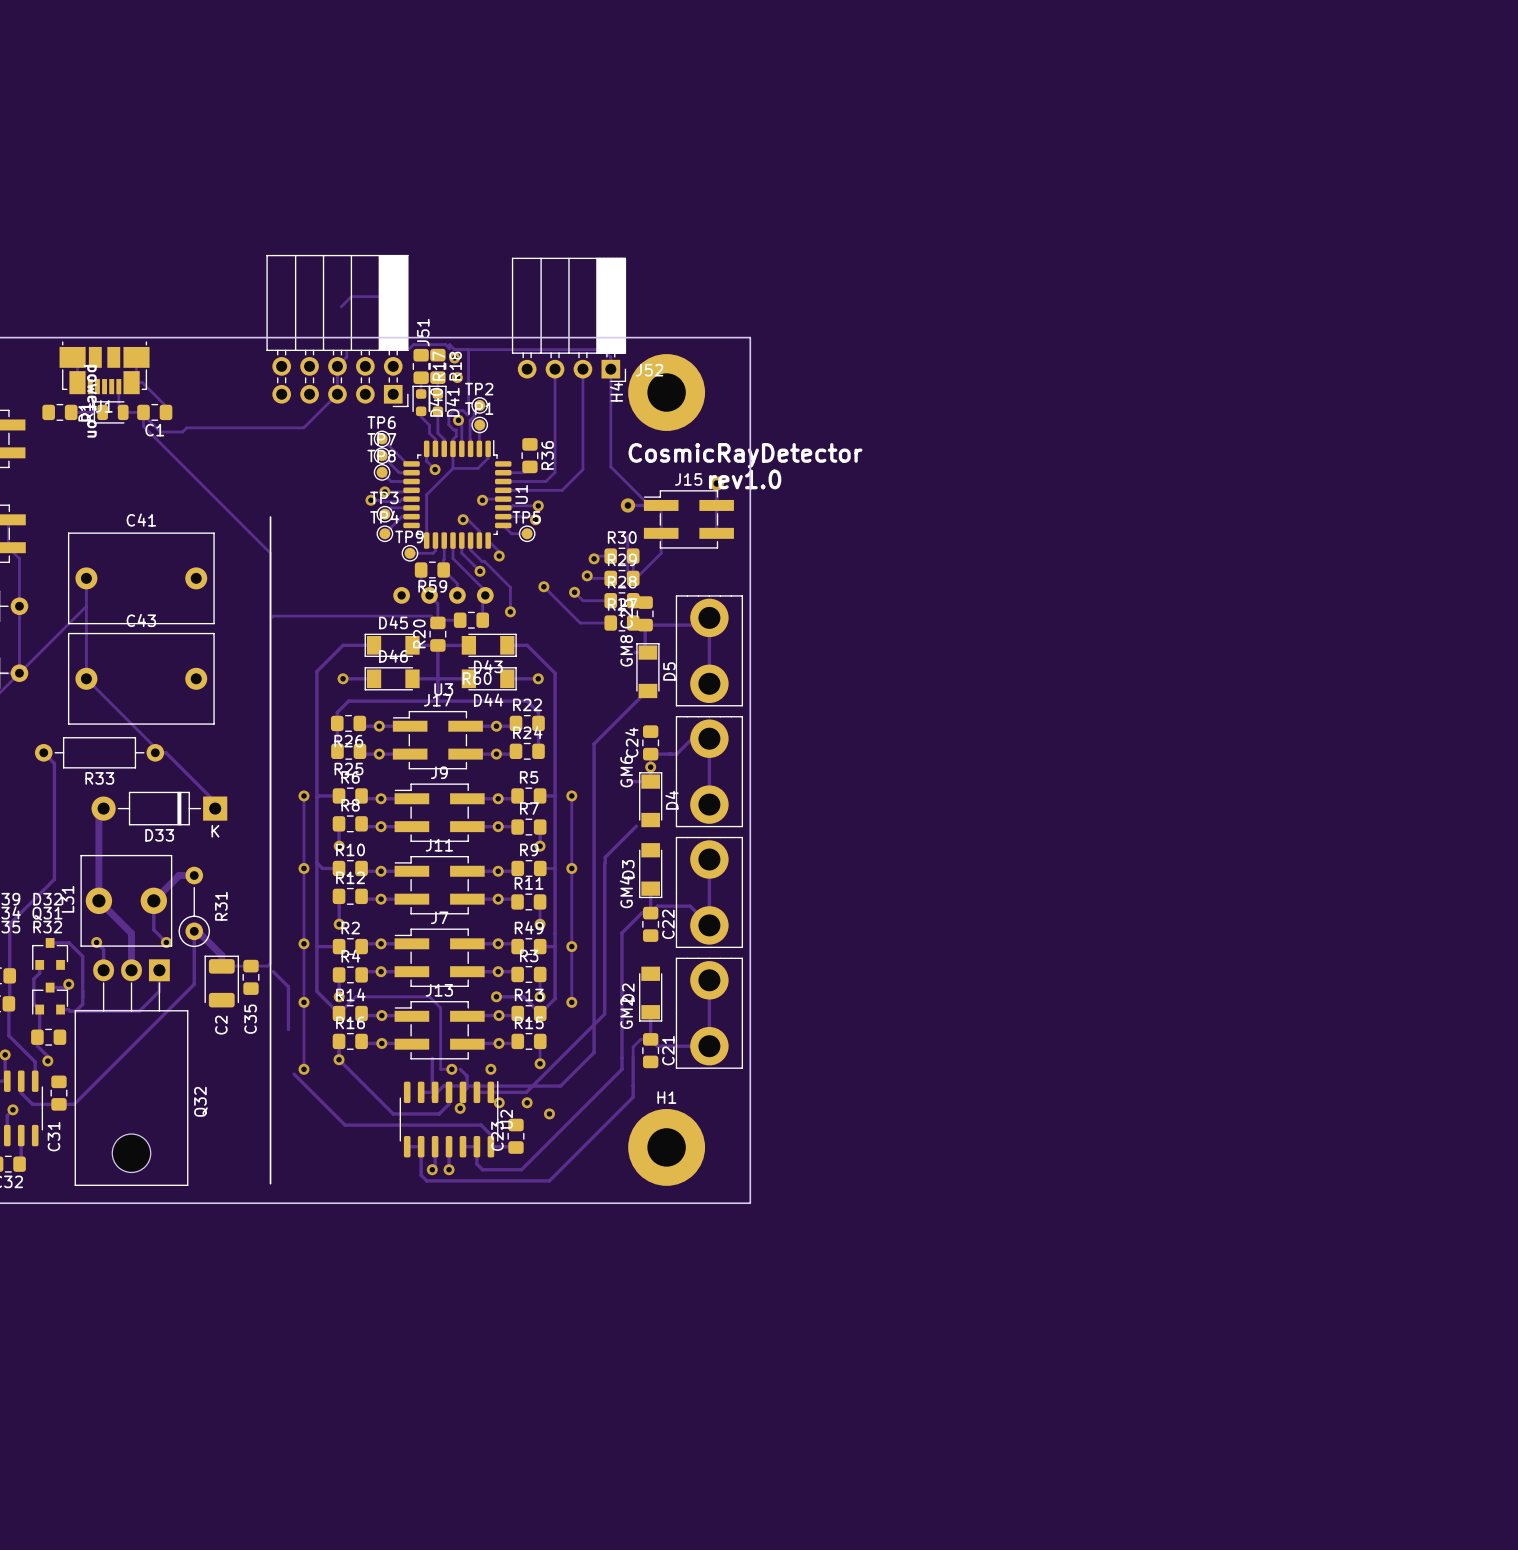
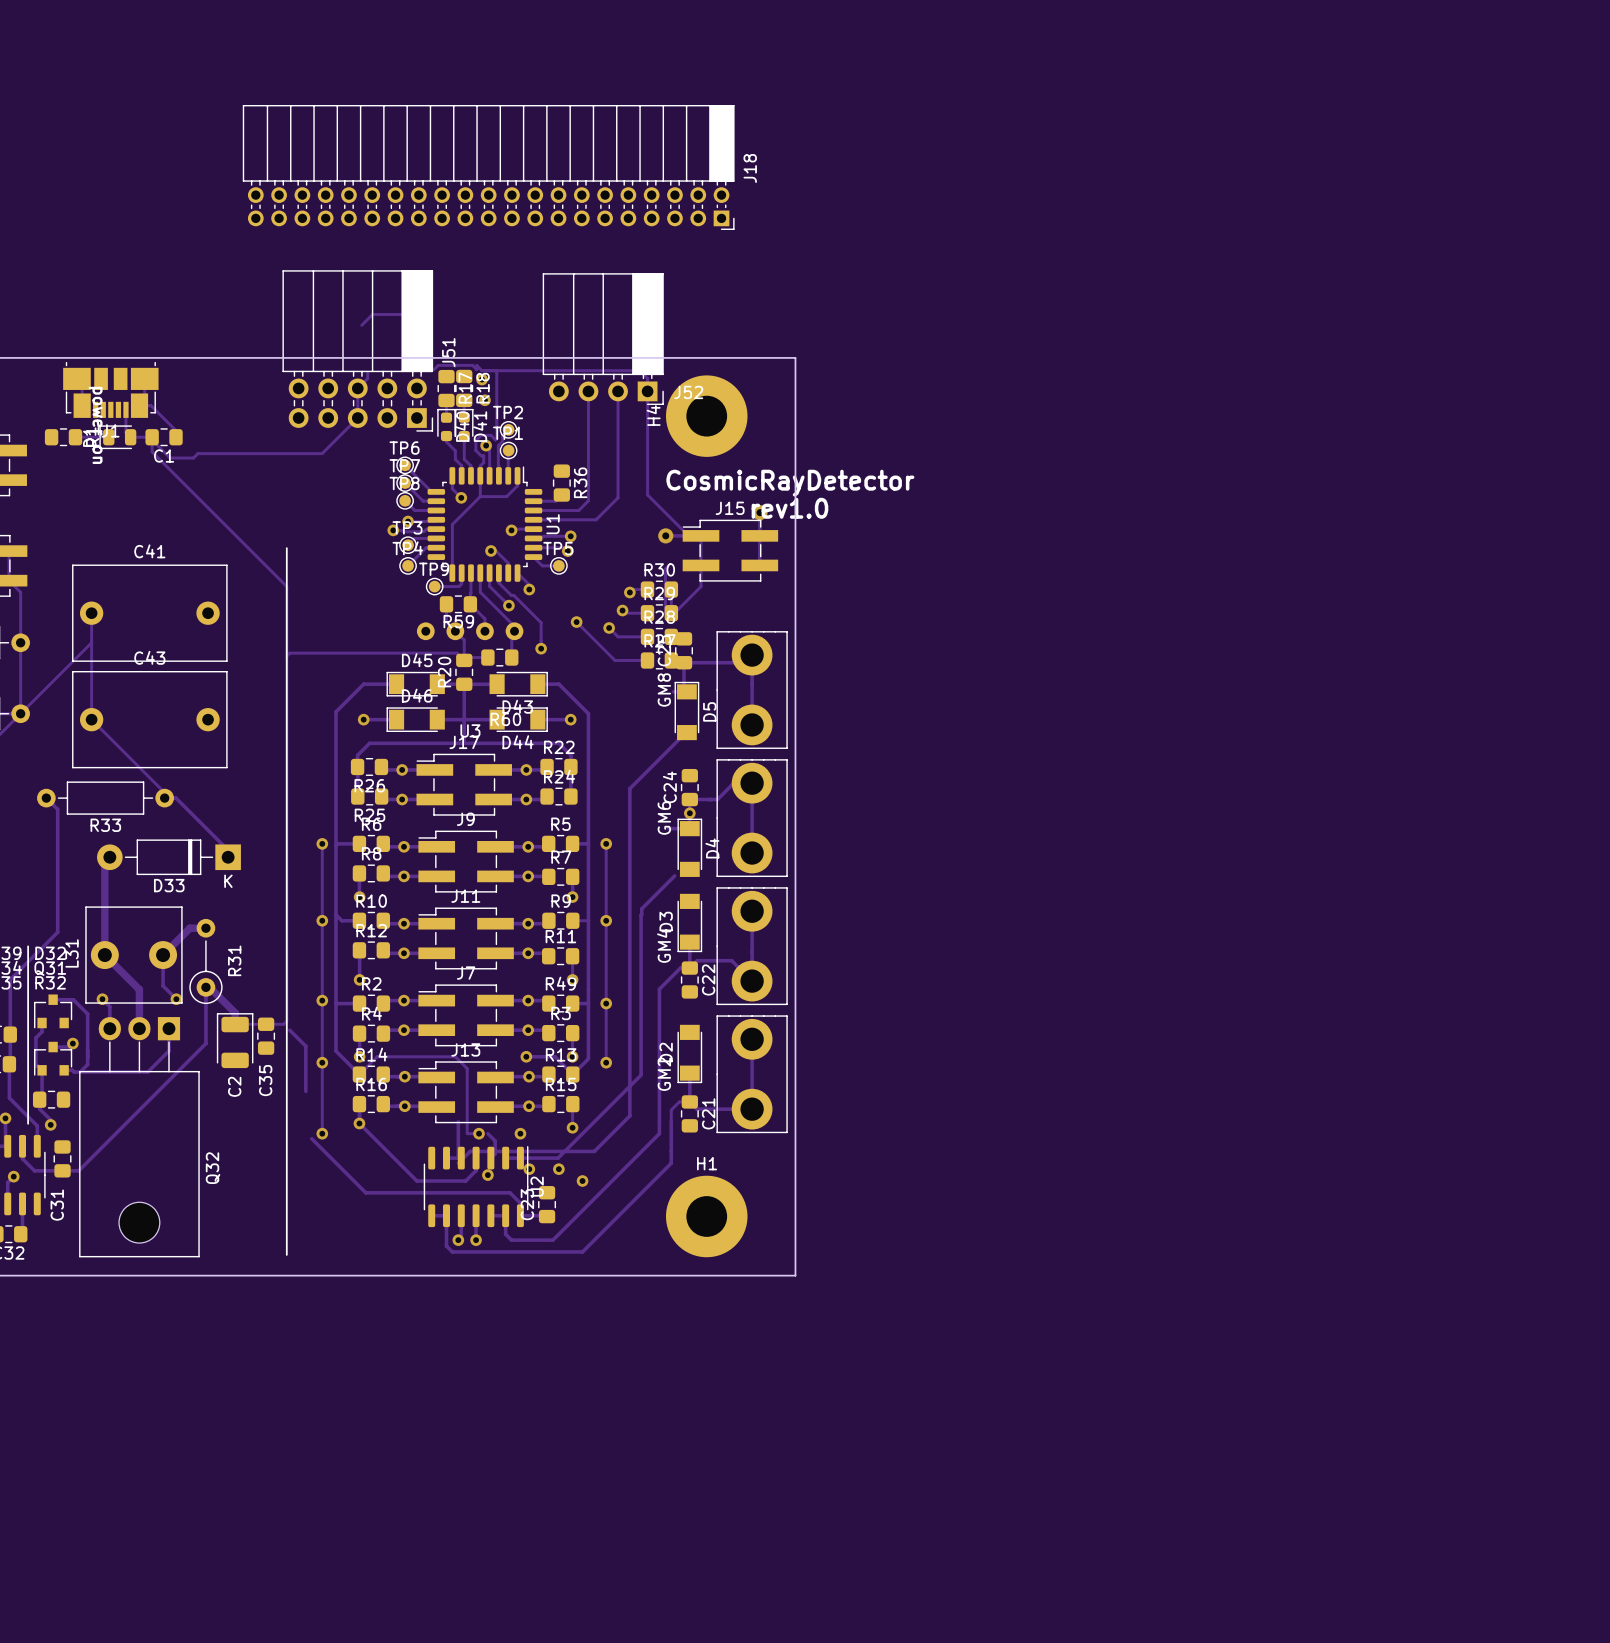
J18: none -> (488, 167)
line: none -> (28, 946) (28, 1123)

